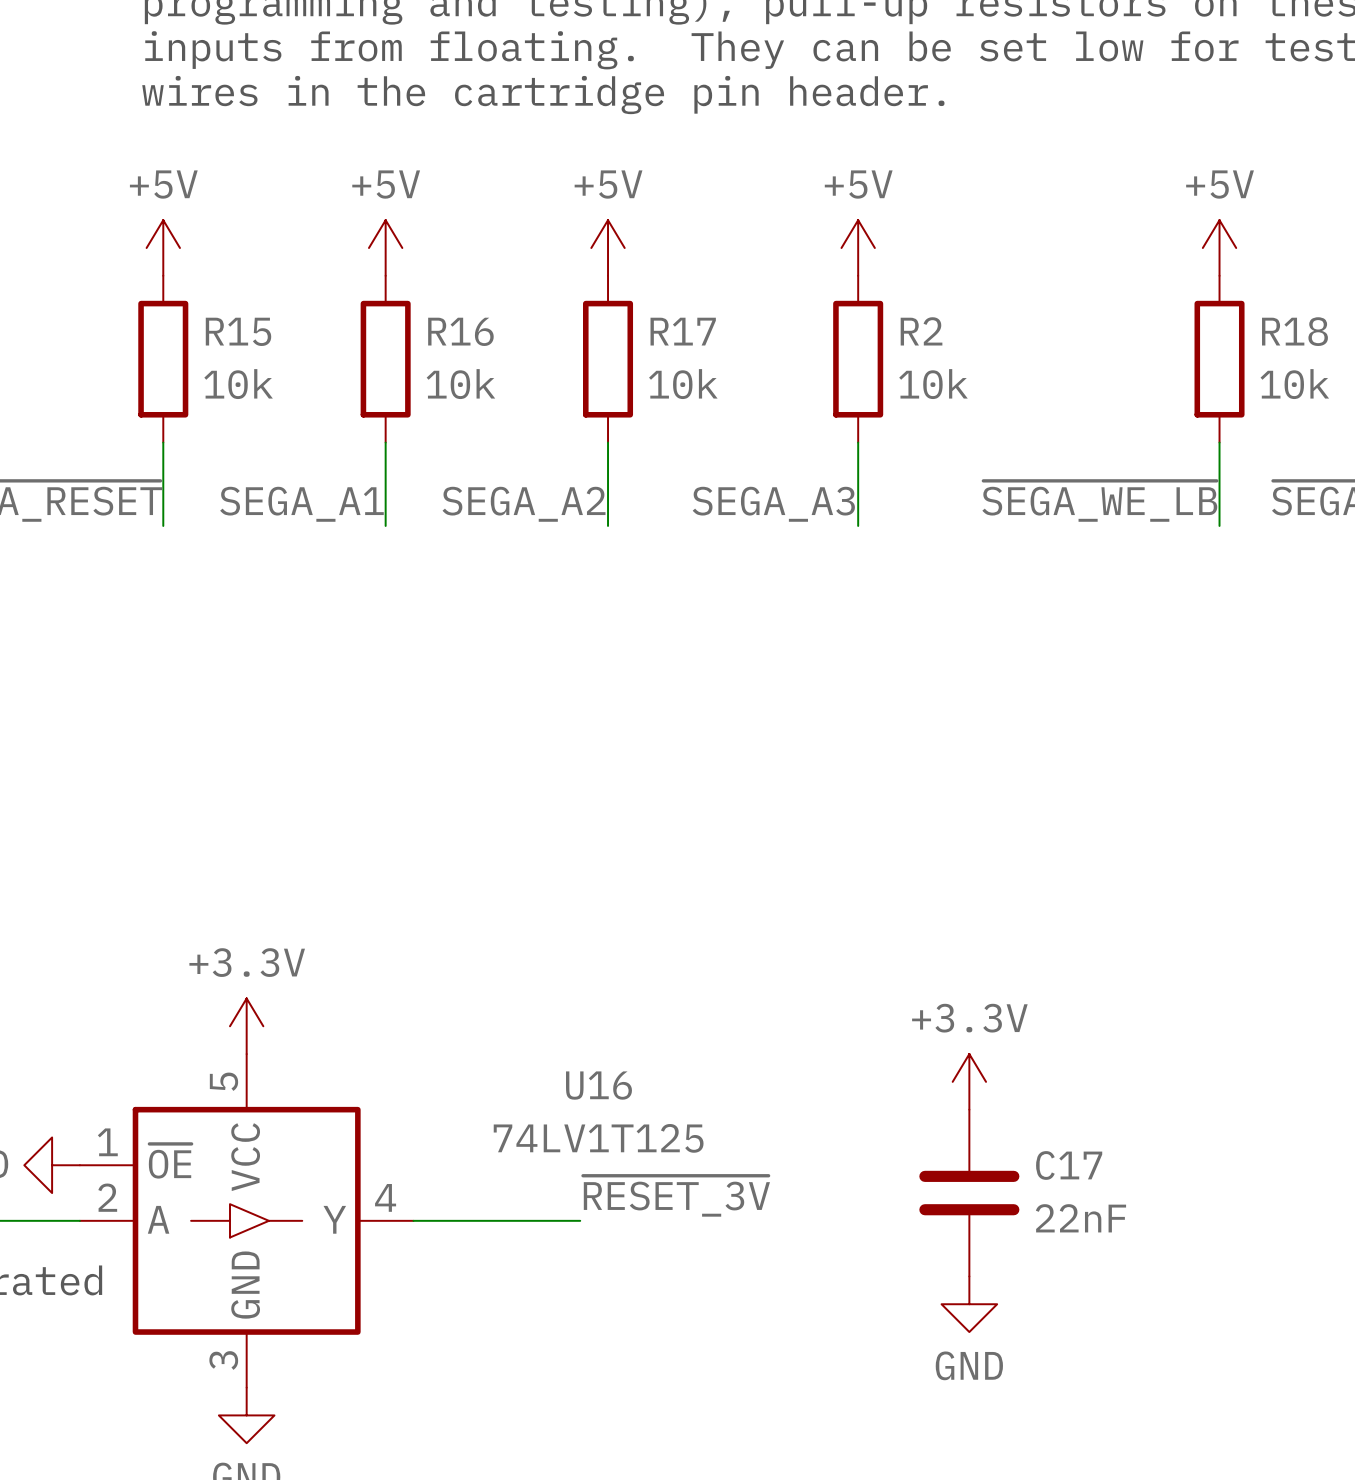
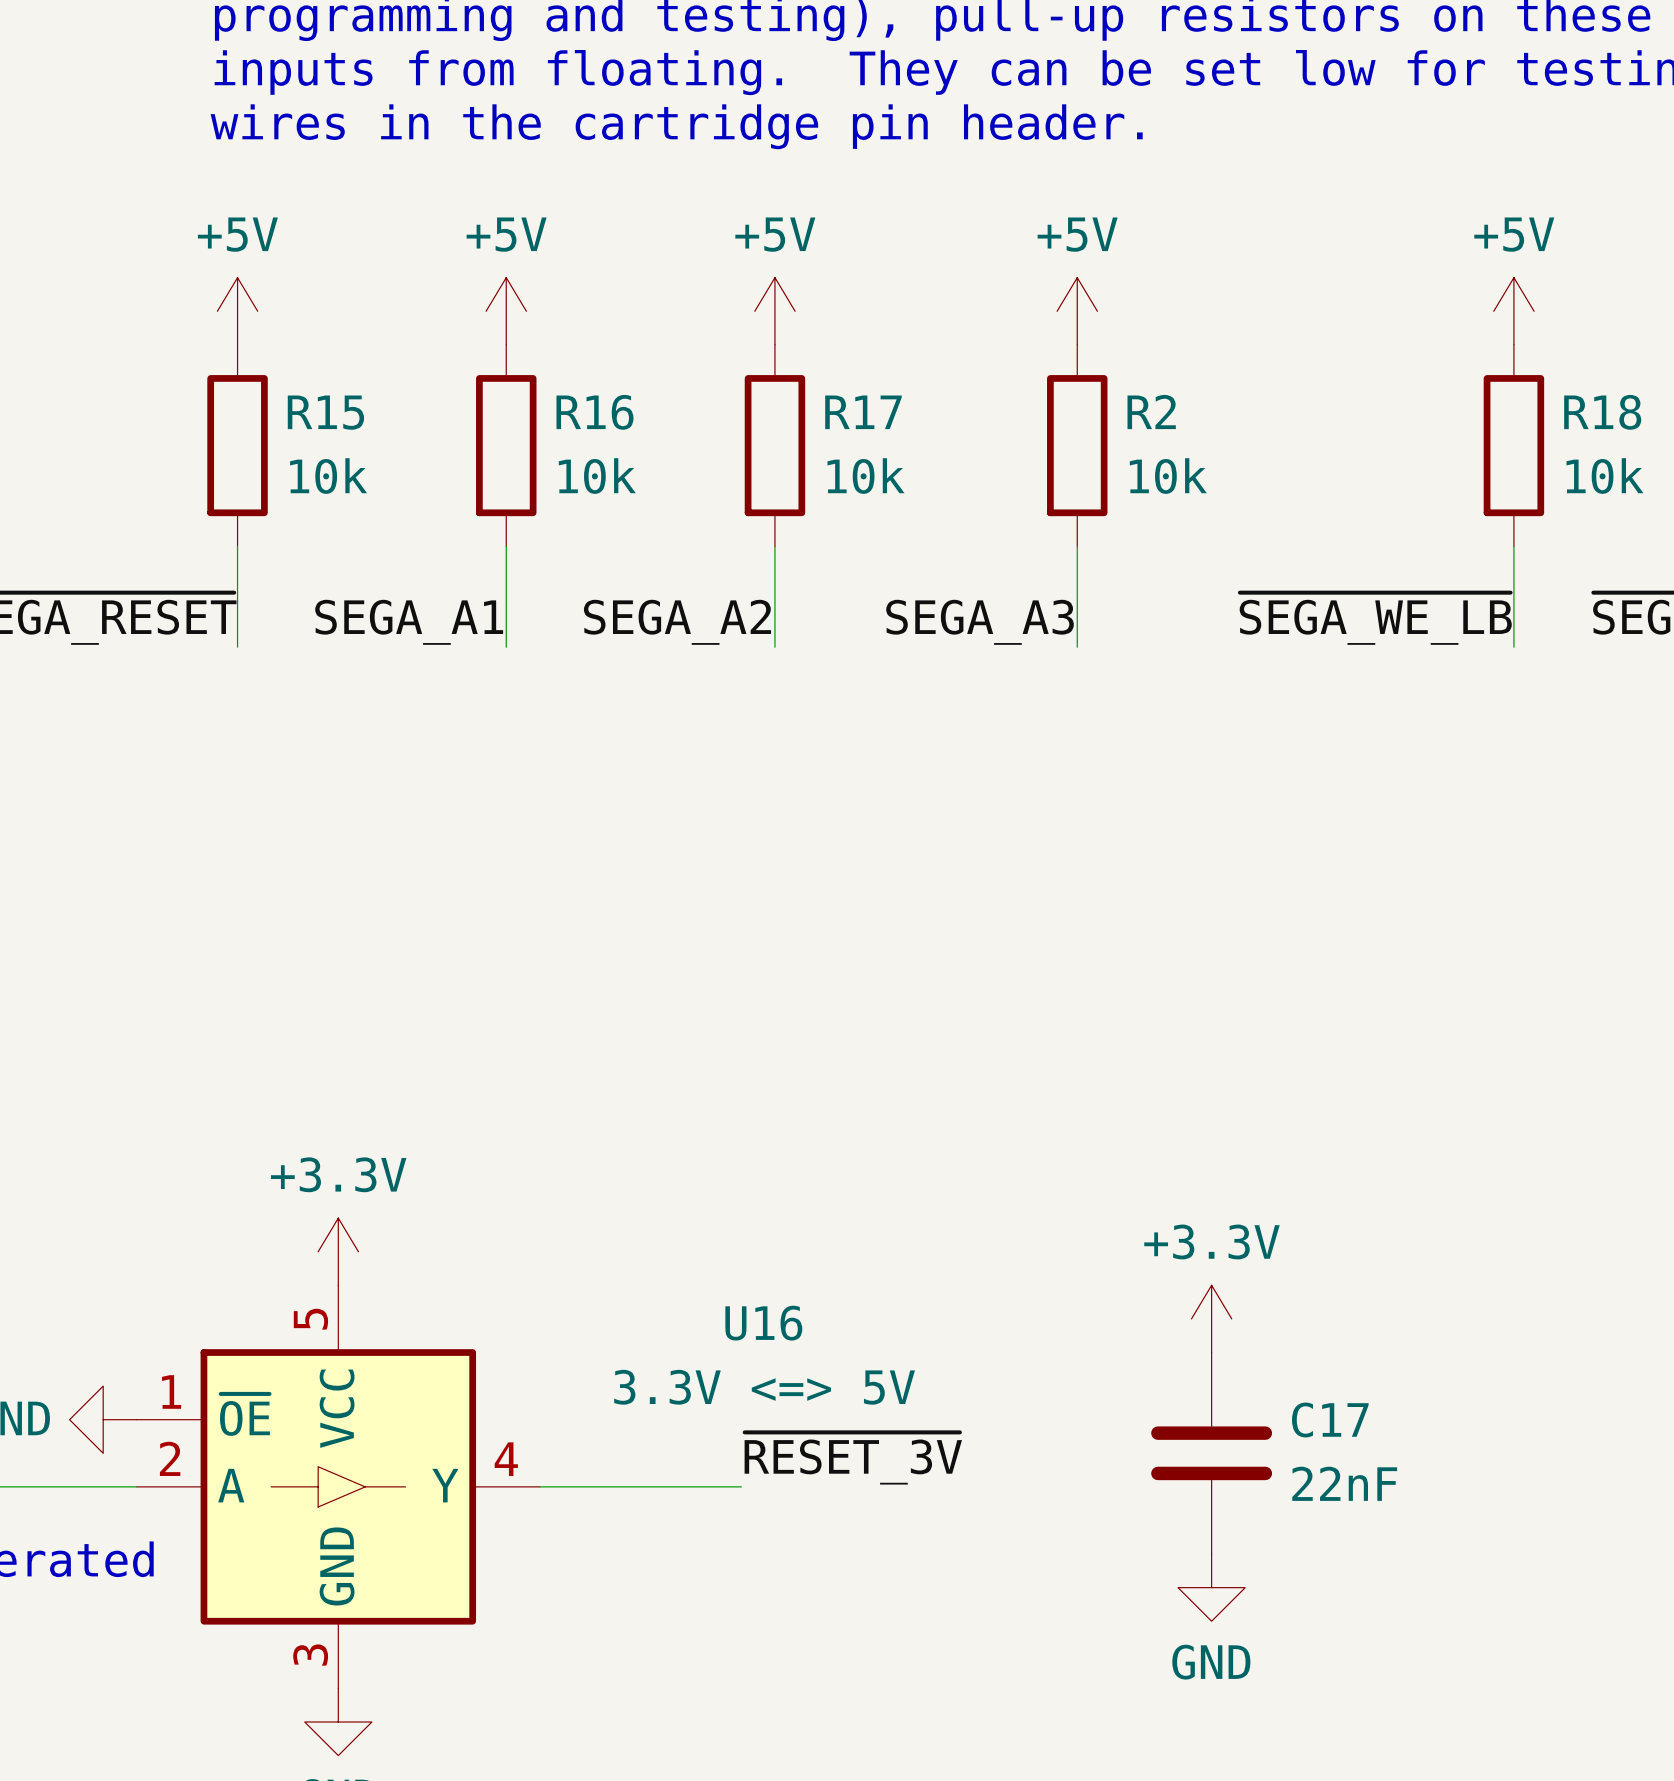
U16 value: 74LV1T125 (598, 1138) -> 3.3V <=> 5V (764, 1387)

